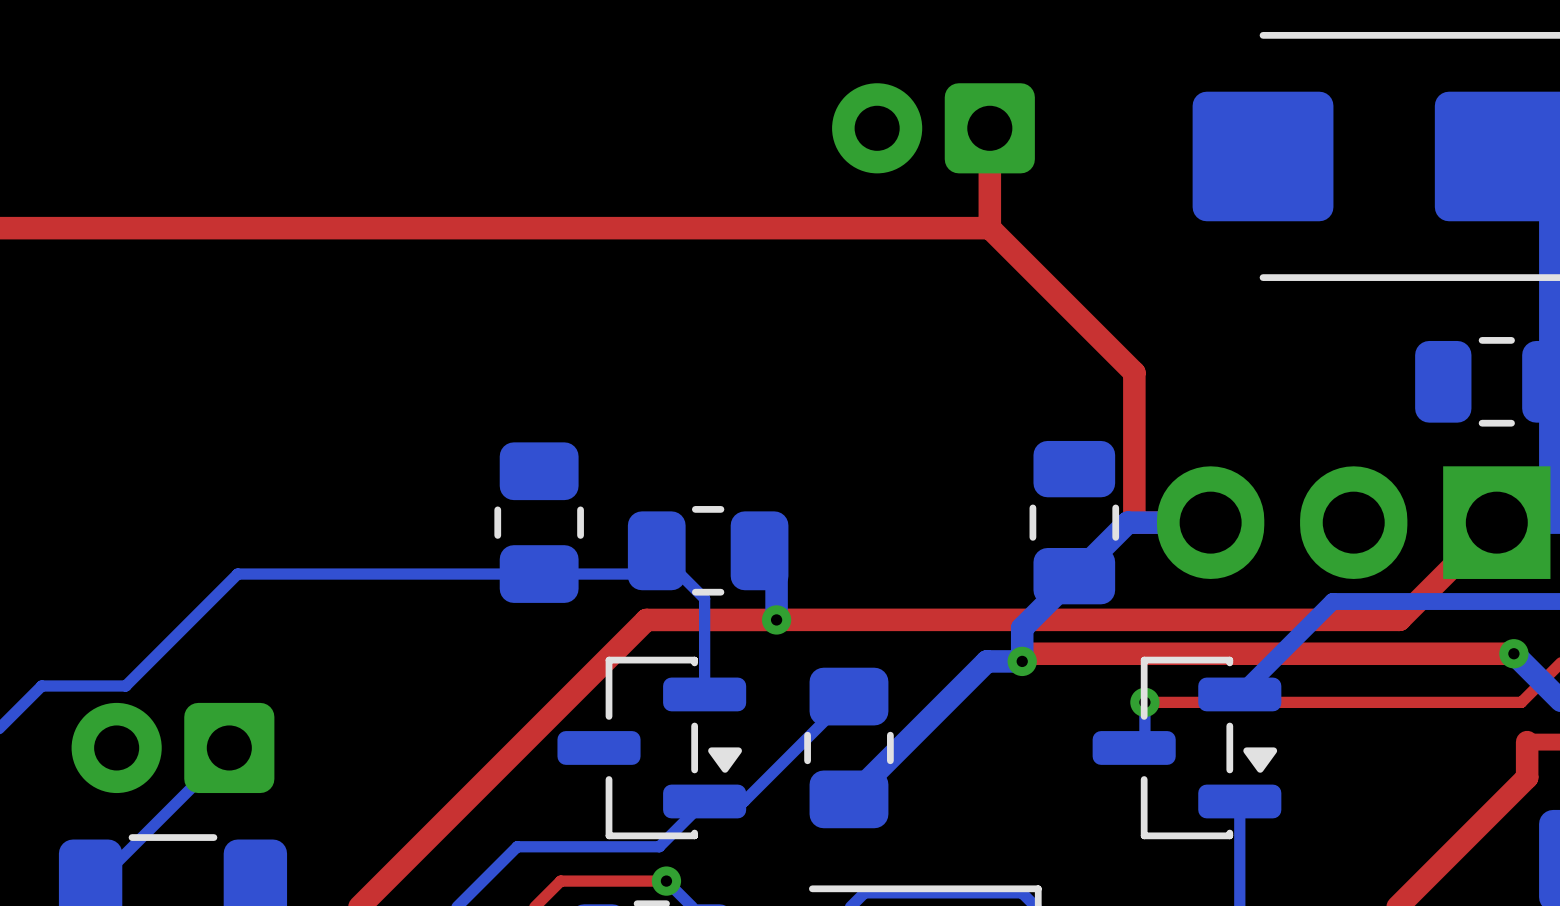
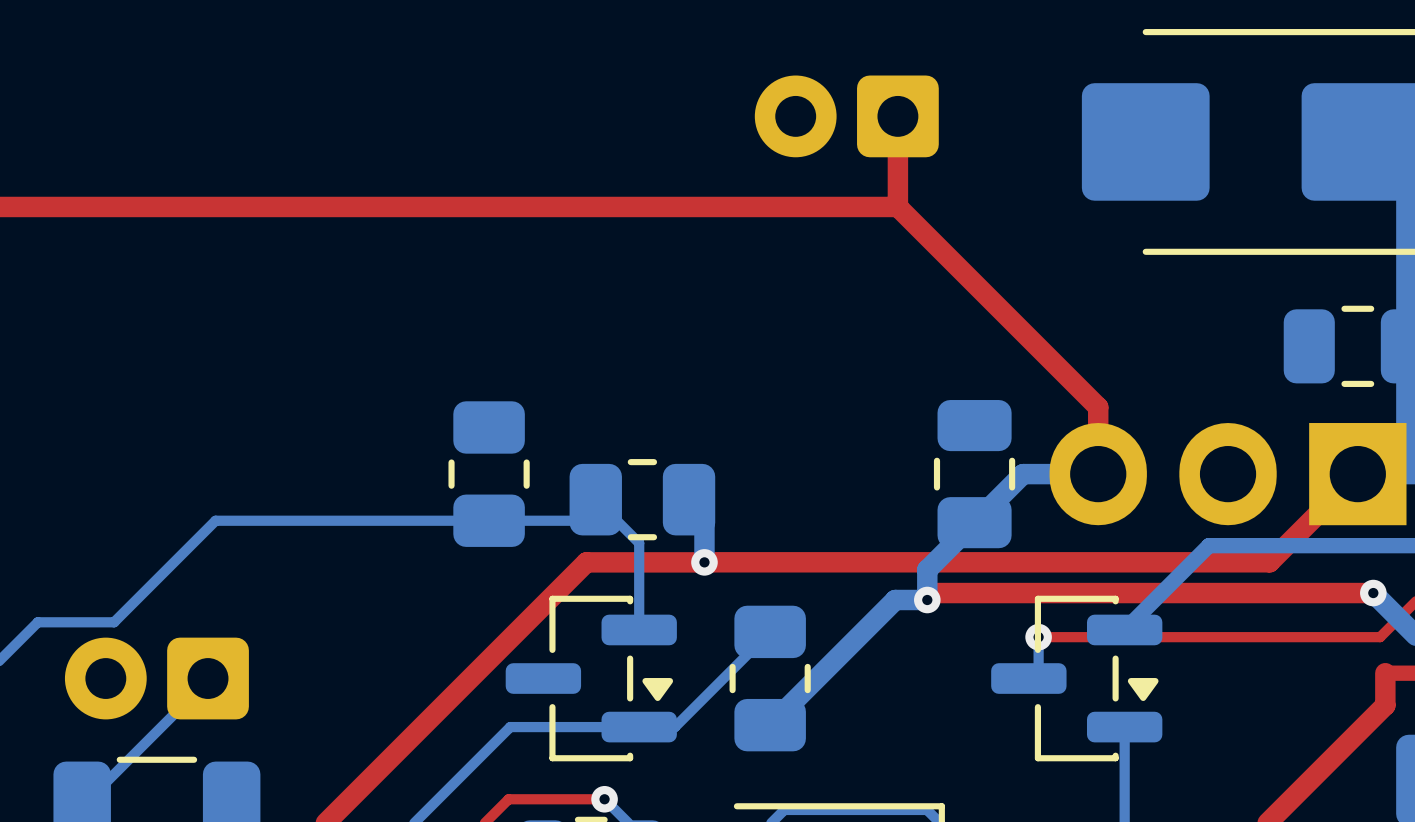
top track: (1134, 372) (1134, 522) (1210, 522) -> (1029, 338) (1098, 407) (1098, 474)
bottom track: (704, 801) (659, 846) (517, 846) -> (639, 727) (510, 727) (469, 768)

